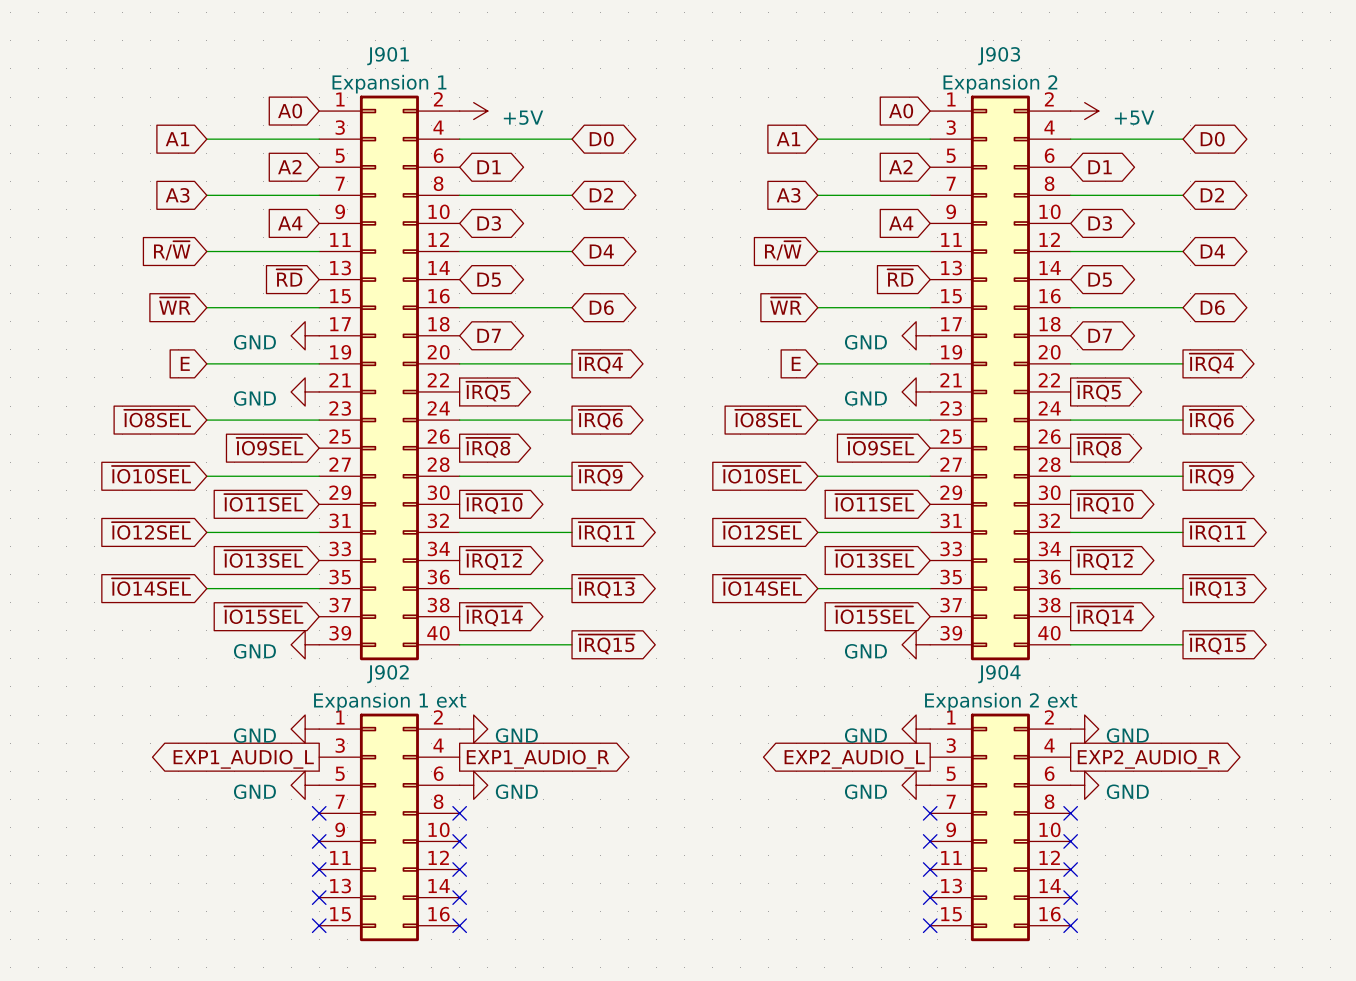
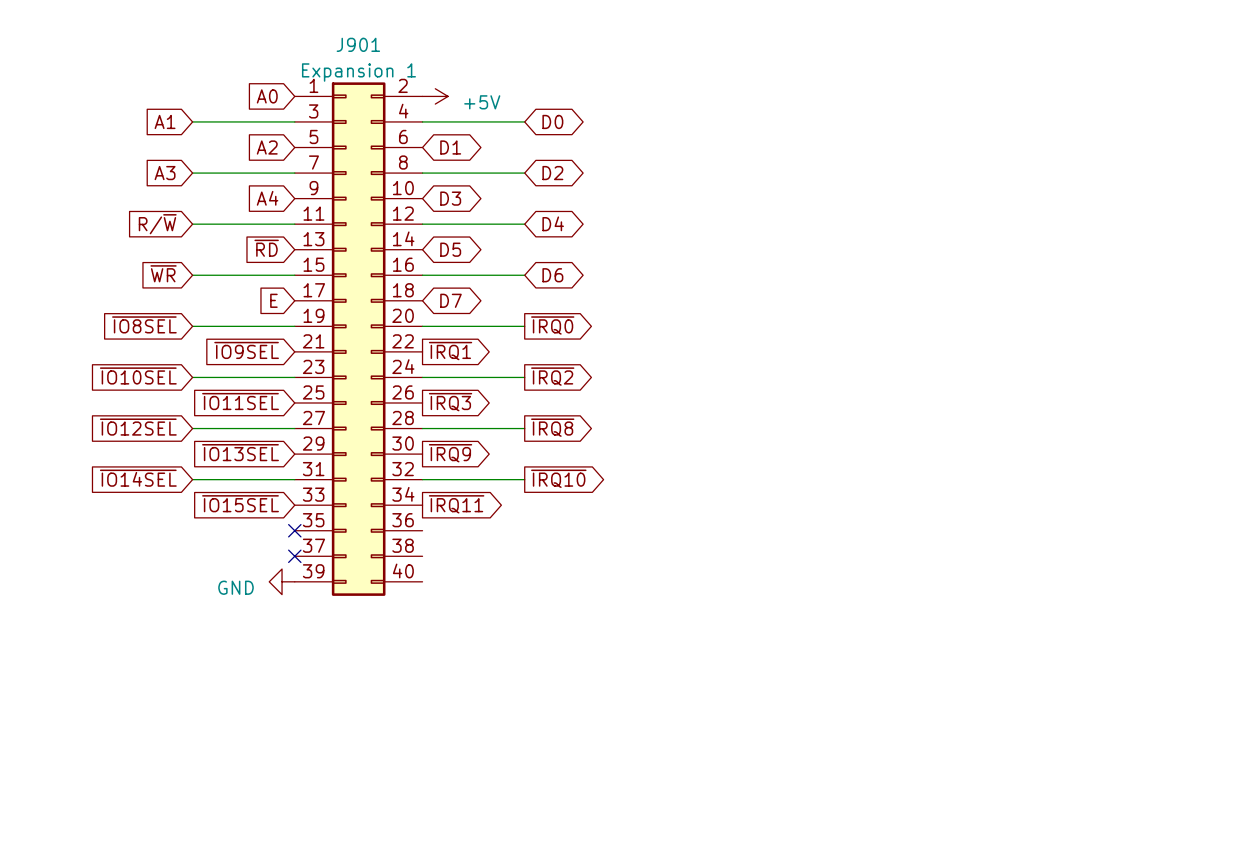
global label: A0 (901, 111) -> none
power symbol: +5V (1084, 111) -> none
global label: A1 (788, 139) -> none
wire: (817, 139) (930, 139) -> none
wire: (1070, 139) (1183, 139) -> none
global label: D0 (1212, 139) -> none
global label: A2 (900, 167) -> none
global label: D1 (1100, 167) -> none
global label: A3 (788, 195) -> none
wire: (817, 195) (930, 195) -> none
wire: (1070, 195) (1183, 195) -> none
global label: D2 (1212, 195) -> none
global label: A4 (901, 223) -> none
global label: D3 (1100, 223) -> none
global label: R/~{W} (783, 250) -> none
wire: (817, 251) (930, 251) -> none
wire: (1070, 251) (1183, 251) -> none
global label: D4 (1212, 251) -> none
global label: ~{RD} (900, 277) -> none
global label: D5 (1100, 279) -> none
global label: ~{WR} (785, 306) -> none
wire: (817, 307) (930, 307) -> none
wire: (1070, 307) (1183, 307) -> none
global label: D6 (1212, 307) -> none
global label: none -> E (273, 300)
power symbol: GND (305, 335) -> none
power symbol: GND (916, 335) -> none
global label: D7 (1100, 335) -> none
global label: E (185, 363) -> ~{IO8SEL} (144, 324)
global label: ~{IRQ4} (600, 363) -> ~{IRQ0} (552, 325)
global label: E (796, 363) -> none
wire: (817, 363) (930, 363) -> none
wire: (1070, 363) (1183, 363) -> none
global label: ~{IRQ4} (1211, 363) -> none
J903: Expansion 2 (1000, 377) -> none
global label: none -> ~{IO9SEL} (246, 350)
power symbol: GND (305, 391) -> none
global label: ~{IRQ5} (488, 391) -> ~{IRQ1} (450, 351)
power symbol: GND (916, 391) -> none
global label: ~{IRQ5} (1099, 391) -> none
global label: ~{IO8SEL} (157, 418) -> ~{IO10SEL} (138, 375)
global label: ~{IO8SEL} (768, 418) -> none
global label: ~{IRQ6} (600, 419) -> ~{IRQ2} (552, 376)
global label: ~{IRQ6} (1211, 419) -> none
wire: (817, 420) (930, 420) -> none
wire: (1070, 420) (1183, 420) -> none
global label: ~{IO9SEL} (269, 446) -> ~{IO11SEL} (240, 401)
global label: ~{IO9SEL} (880, 446) -> none
global label: ~{IRQ8} (488, 447) -> ~{IRQ3} (450, 402)
global label: ~{IRQ8} (1099, 447) -> none
global label: ~{IO10SEL} (151, 474) -> ~{IO12SEL} (138, 427)
global label: ~{IO10SEL} (762, 474) -> none
global label: ~{IRQ9} (600, 475) -> ~{IRQ8} (552, 427)
global label: ~{IRQ9} (1211, 475) -> none
wire: (817, 476) (930, 476) -> none
wire: (1070, 476) (1183, 476) -> none
global label: ~{IO11SEL} (263, 502) -> ~{IO13SEL} (240, 452)
global label: ~{IO11SEL} (874, 502) -> none
global label: ~{IRQ10} (494, 503) -> ~{IRQ9} (450, 453)
global label: ~{IRQ10} (1105, 503) -> none
global label: ~{IO12SEL} (151, 530) -> ~{IO14SEL} (138, 478)
global label: ~{IO12SEL} (762, 530) -> none
global label: ~{IRQ11} (606, 532) -> ~{IRQ10} (558, 478)
wire: (817, 532) (930, 532) -> none
wire: (1070, 532) (1183, 532) -> none
global label: ~{IRQ11} (1217, 532) -> none
global label: ~{IO13SEL} (263, 559) -> ~{IO15SEL} (240, 503)
global label: ~{IO13SEL} (874, 559) -> none
global label: ~{IRQ12} (494, 560) -> ~{IRQ11} (456, 504)
global label: ~{IRQ12} (1105, 560) -> none
global label: ~{IO14SEL} (151, 587) -> none
global label: ~{IO14SEL} (762, 587) -> none
wire: (206, 588) (319, 588) -> none
no-connect mark: none -> (294, 530)
wire: (459, 588) (572, 588) -> none
global label: ~{IRQ13} (606, 588) -> none
wire: (817, 588) (930, 588) -> none
wire: (1070, 588) (1183, 588) -> none
global label: ~{IRQ13} (1217, 588) -> none
global label: ~{IO15SEL} (263, 615) -> none
global label: ~{IO15SEL} (874, 615) -> none
no-connect mark: none -> (294, 556)
global label: ~{IRQ14} (494, 616) -> none
global label: ~{IRQ14} (1105, 616) -> none
wire: (459, 644) (572, 644) -> none
global label: ~{IRQ15} (606, 644) -> none
power symbol: GND (916, 644) -> none
wire: (1070, 644) (1183, 644) -> none
global label: ~{IRQ15} (1217, 644) -> none
power symbol: GND (305, 729) -> none
power symbol: GND (473, 729) -> none
power symbol: GND (916, 729) -> none
power symbol: GND (1084, 729) -> none
global label: EXP1_AUDIO_L (243, 759) -> none
global label: EXP1_AUDIO_R (538, 759) -> none
global label: EXP2_AUDIO_L (854, 759) -> none
global label: EXP2_AUDIO_R (1149, 759) -> none
power symbol: GND (305, 785) -> none
power symbol: GND (473, 785) -> none
power symbol: GND (916, 785) -> none
power symbol: GND (1084, 785) -> none
no-connect mark: (319, 813) -> none
no-connect mark: (459, 813) -> none
no-connect mark: (930, 813) -> none
no-connect mark: (1070, 813) -> none
J902: Expansion 1 ext (389, 827) -> none
J904: Expansion 2 ext (1000, 827) -> none
no-connect mark: (319, 841) -> none
no-connect mark: (459, 841) -> none
no-connect mark: (930, 841) -> none
no-connect mark: (1070, 841) -> none
no-connect mark: (319, 869) -> none
no-connect mark: (459, 869) -> none
no-connect mark: (930, 869) -> none
no-connect mark: (1070, 869) -> none
no-connect mark: (319, 897) -> none
no-connect mark: (459, 897) -> none
no-connect mark: (930, 897) -> none
no-connect mark: (1070, 897) -> none
no-connect mark: (319, 925) -> none
no-connect mark: (459, 925) -> none
no-connect mark: (930, 925) -> none
no-connect mark: (1070, 925) -> none

